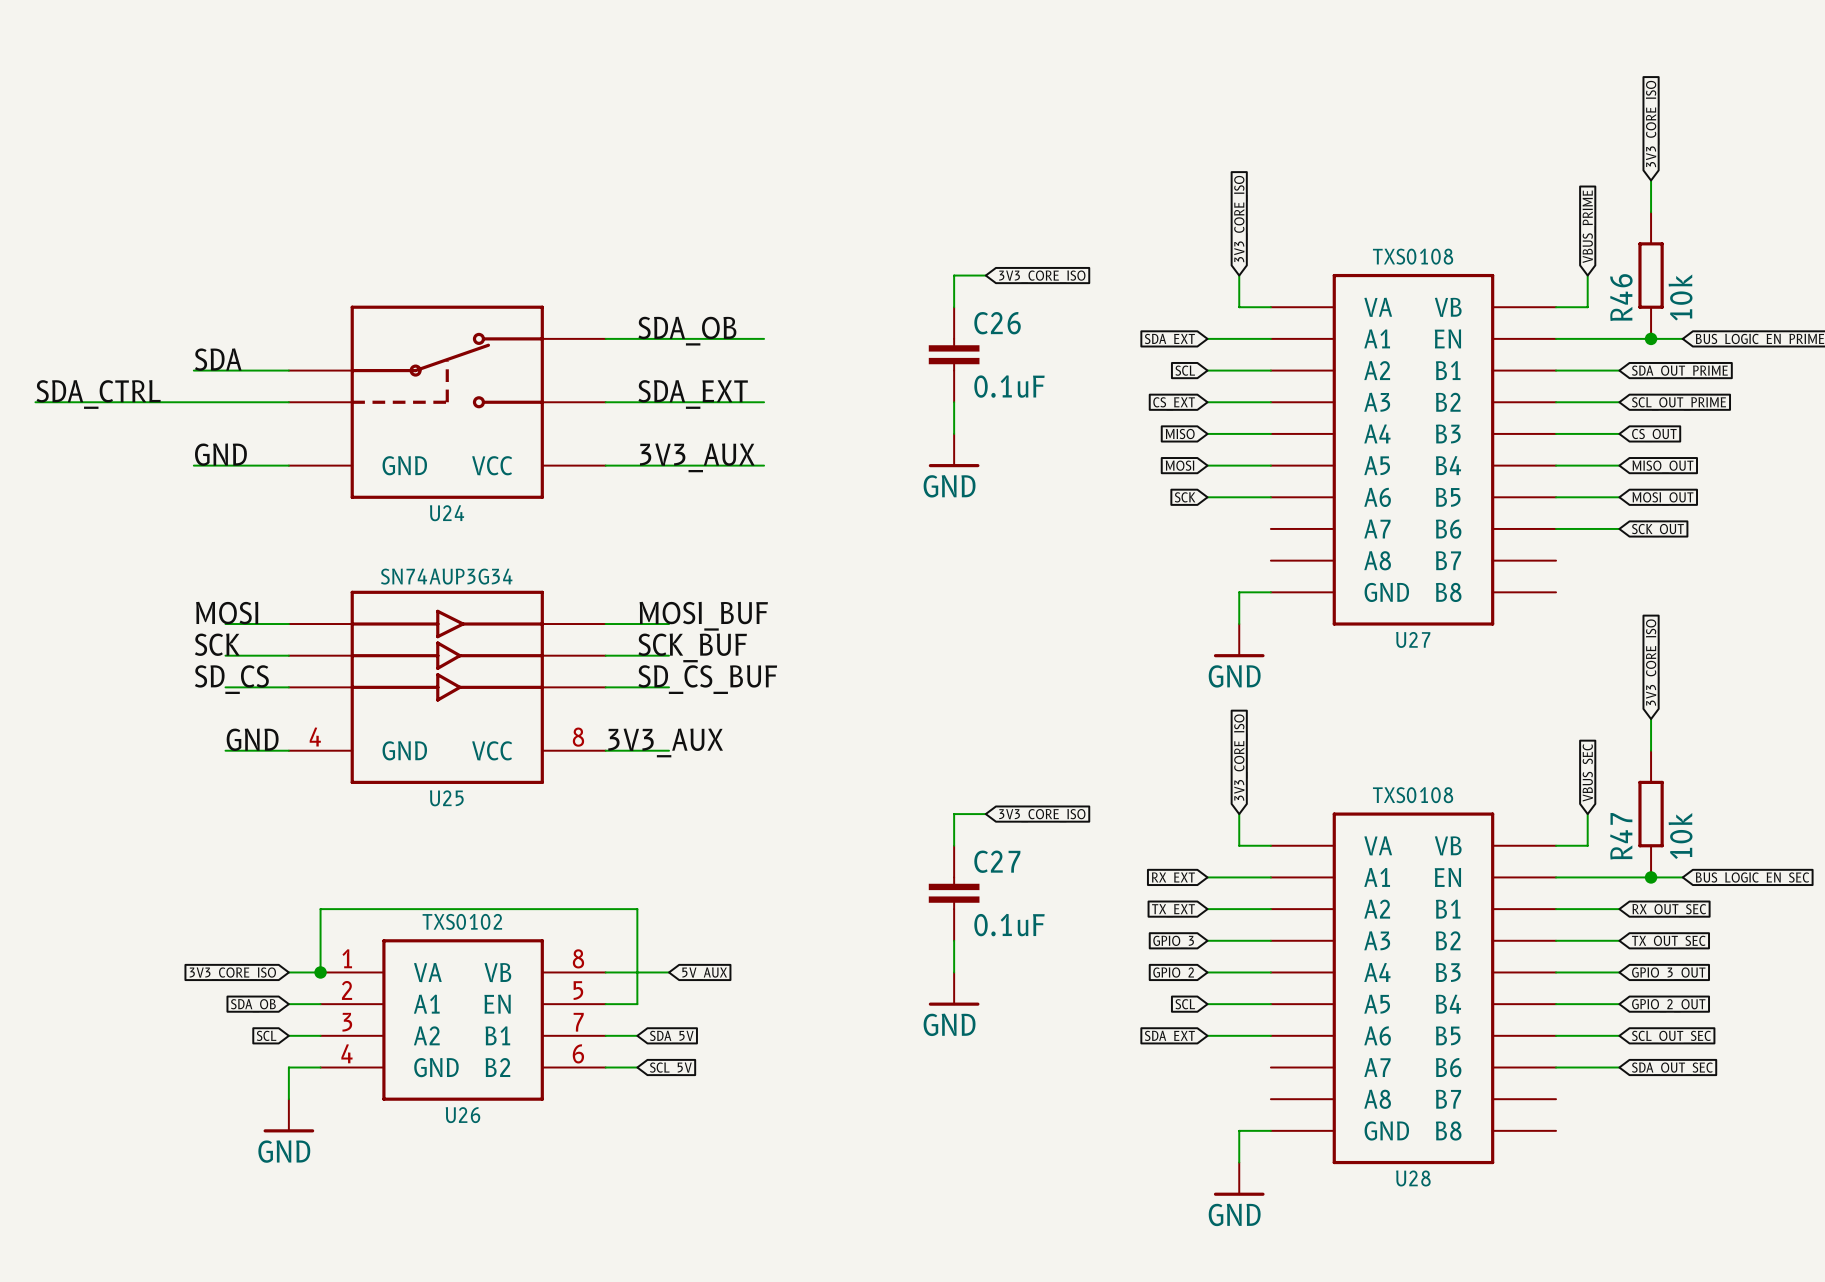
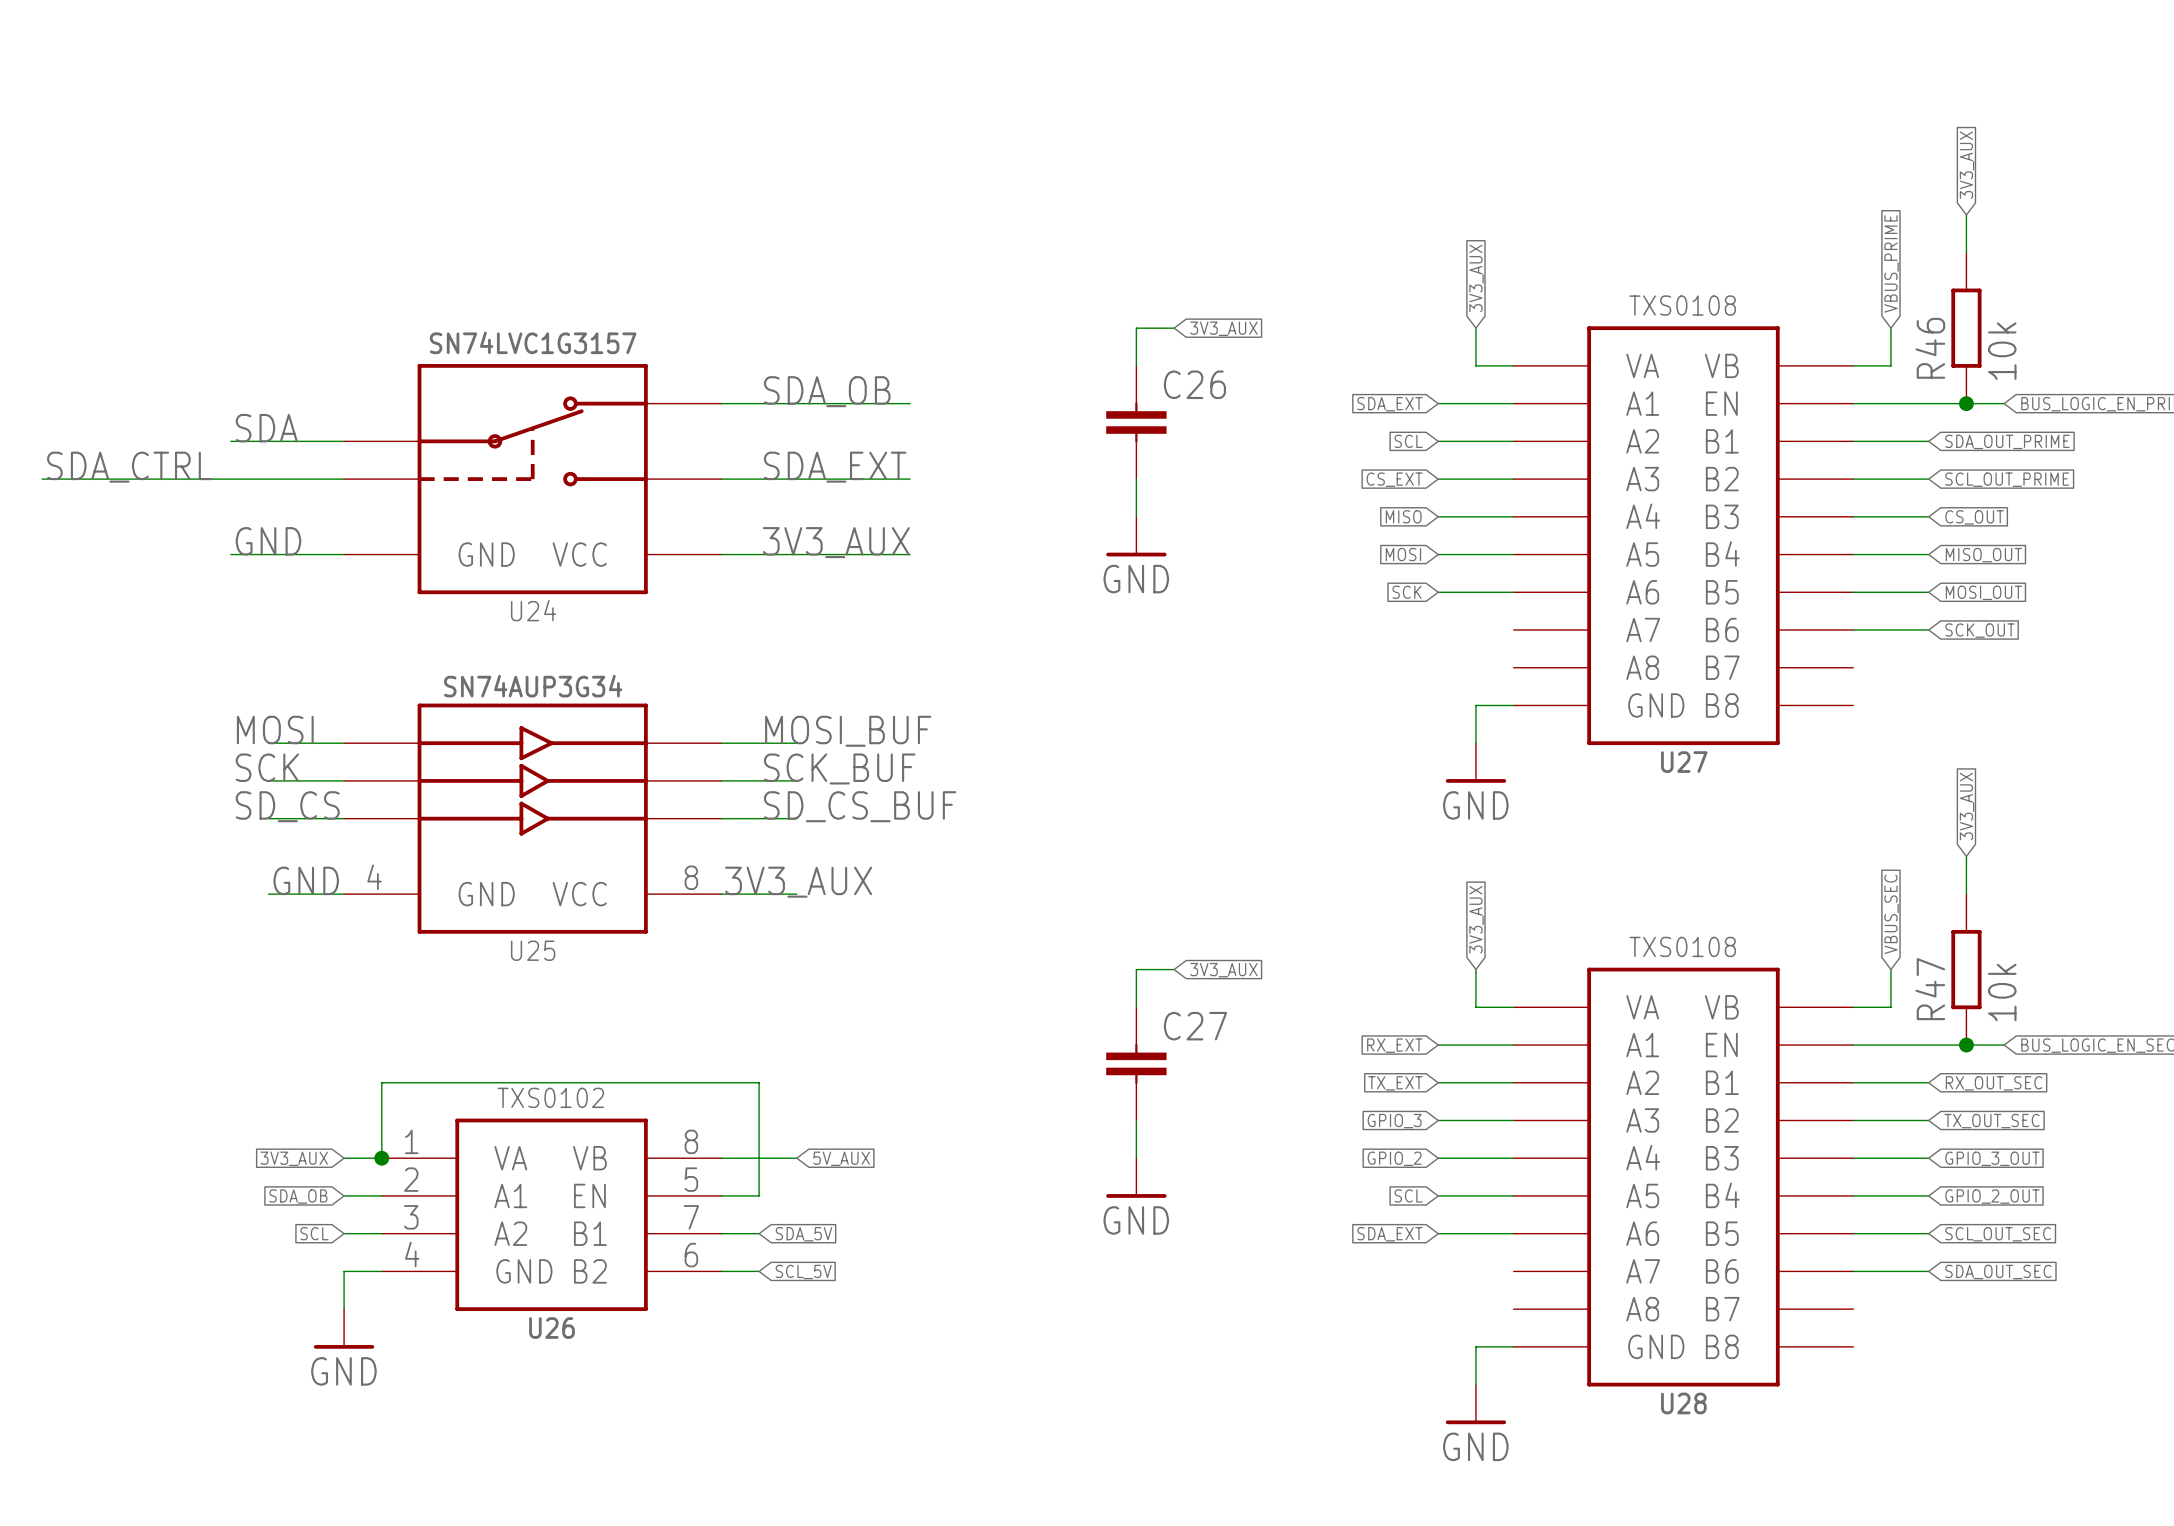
global label: 3V3_CORE_ISO (1652, 123) -> 3V3_AUX (1967, 165)
global label: 3V3_CORE_ISO (1240, 219) -> 3V3_AUX (1476, 278)
global label: 3V3_CORE_ISO (1042, 277) -> 3V3_AUX (1223, 328)
U24 text: none -> SN74LVC1G3157 (533, 342)
C26 value: 0.1uF (1009, 386) -> none
global label: 3V3_CORE_ISO (1652, 662) -> 3V3_AUX (1967, 806)
global label: 3V3_CORE_ISO (1240, 757) -> 3V3_AUX (1476, 919)
global label: 3V3_CORE_ISO (1042, 815) -> 3V3_AUX (1223, 970)
C27 value: 0.1uF (1009, 925) -> none
global label: 3V3_CORE_ISO (232, 973) -> 3V3_AUX (294, 1158)

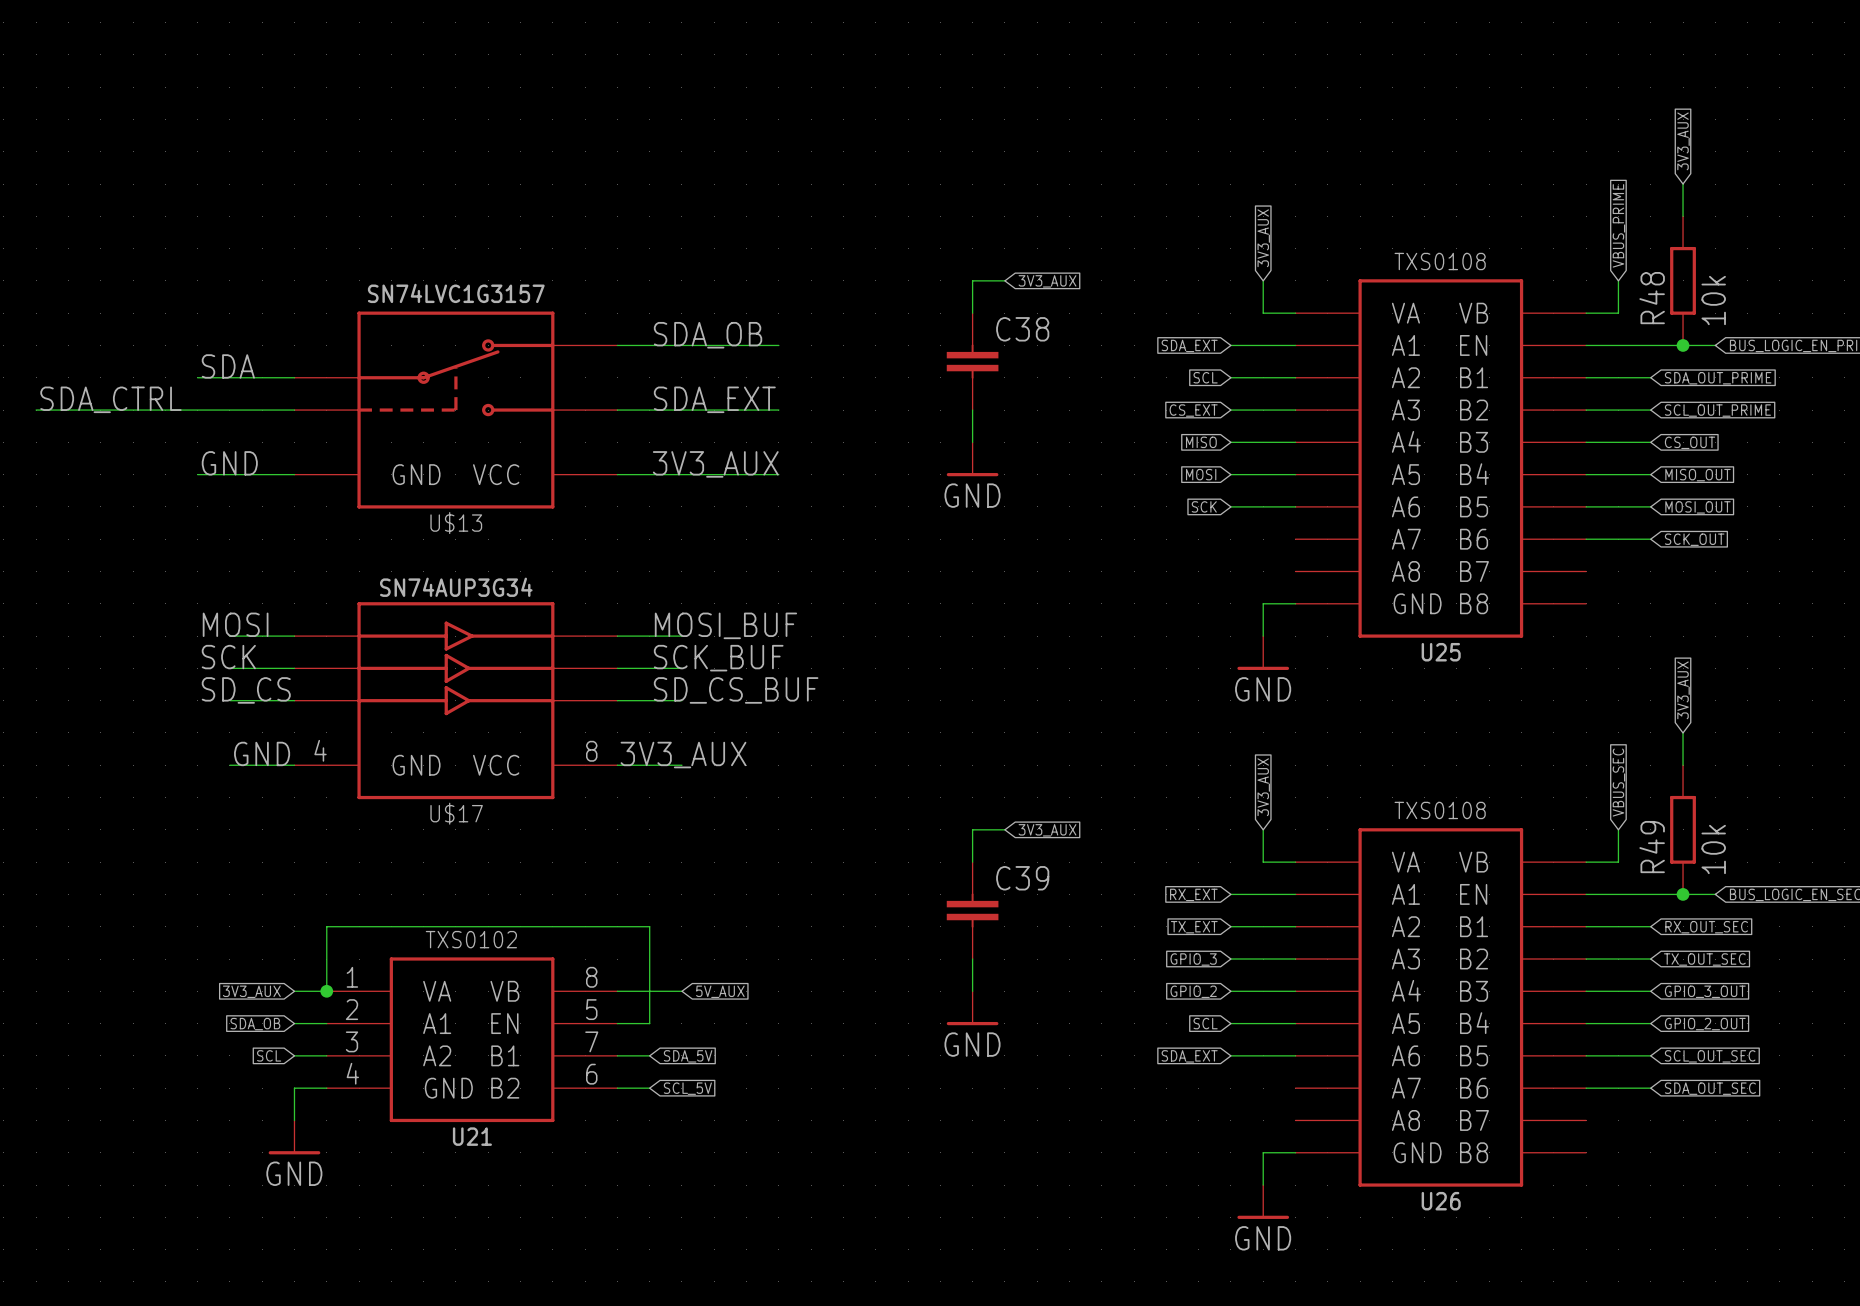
R46 name: R46 (1930, 348) -> R48 (1652, 298)
C26 name: C26 (1194, 384) -> C38 (1022, 329)
U24 name: U24 (533, 610) -> U$13 (456, 523)
U27 name: U27 (1684, 762) -> U25 (1441, 652)
U25 name: U25 (533, 950) -> U$17 (456, 813)
R47 name: R47 (1930, 989) -> R49 (1652, 847)
C27 name: C27 (1195, 1026) -> C39 (1022, 878)
U26 name: U26 (551, 1328) -> U21 (472, 1136)
U28 name: U28 (1683, 1403) -> U26 (1441, 1201)

